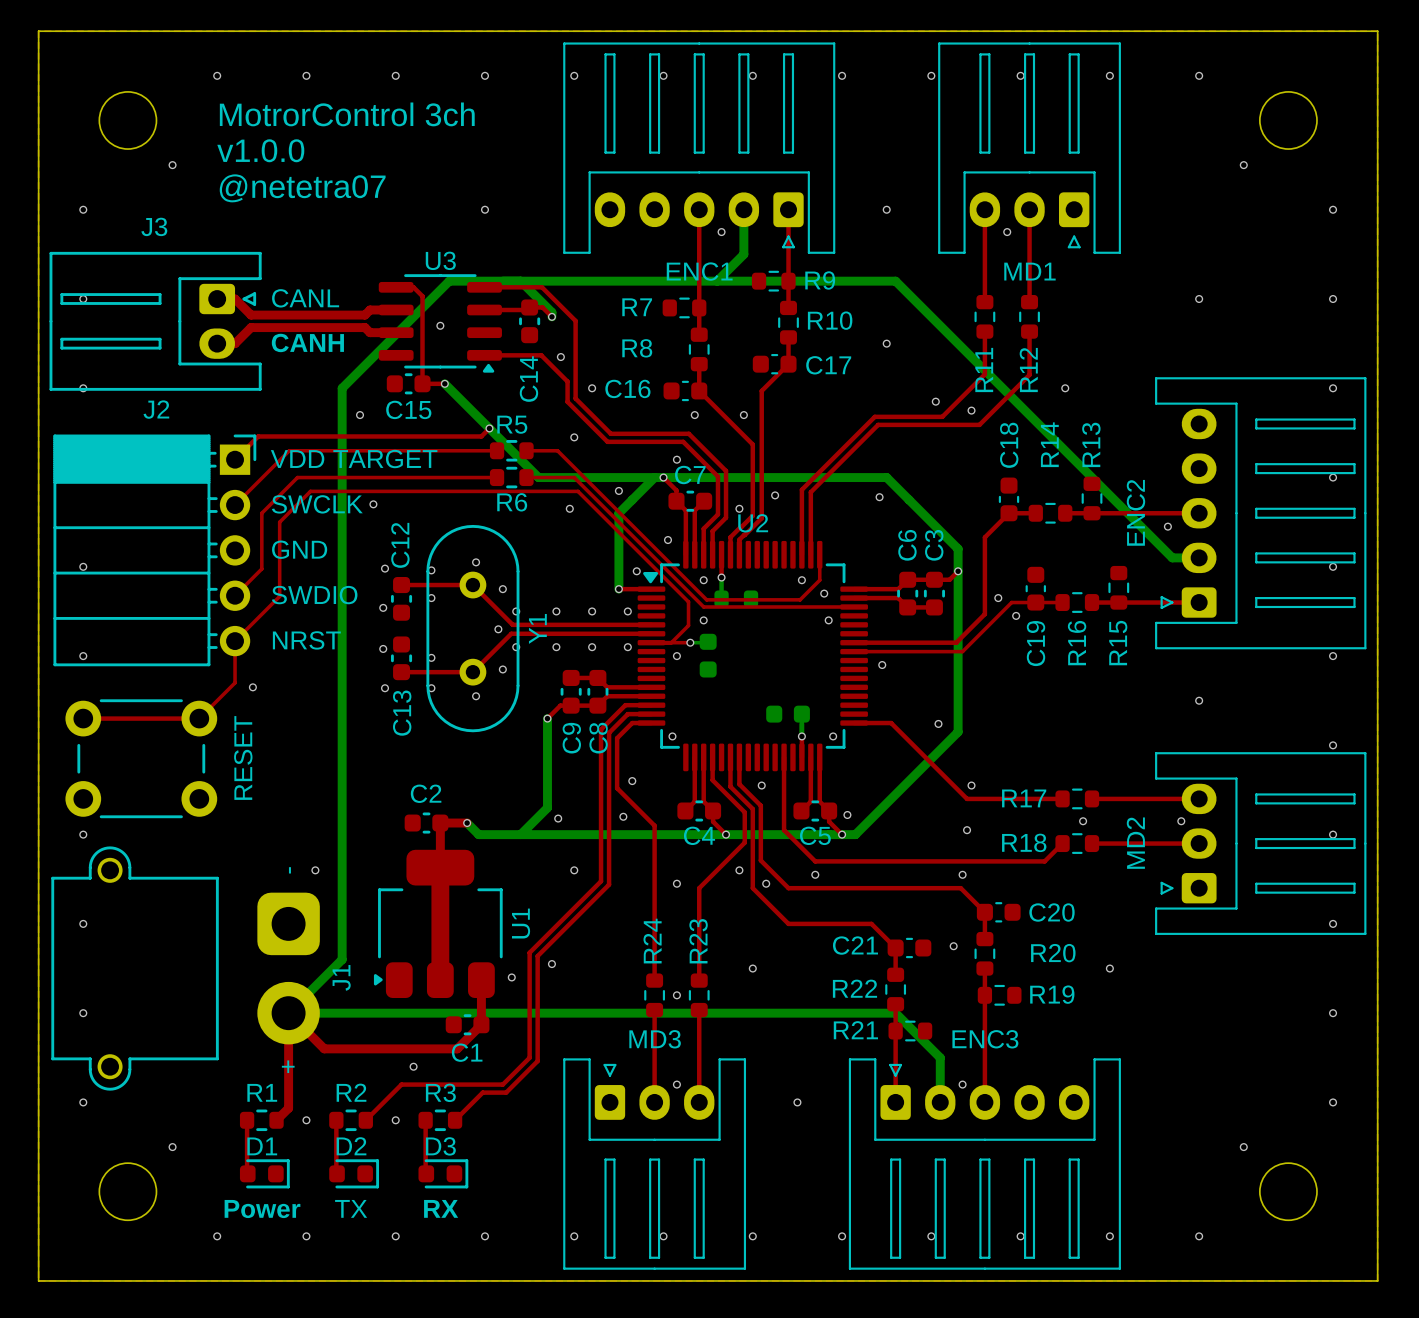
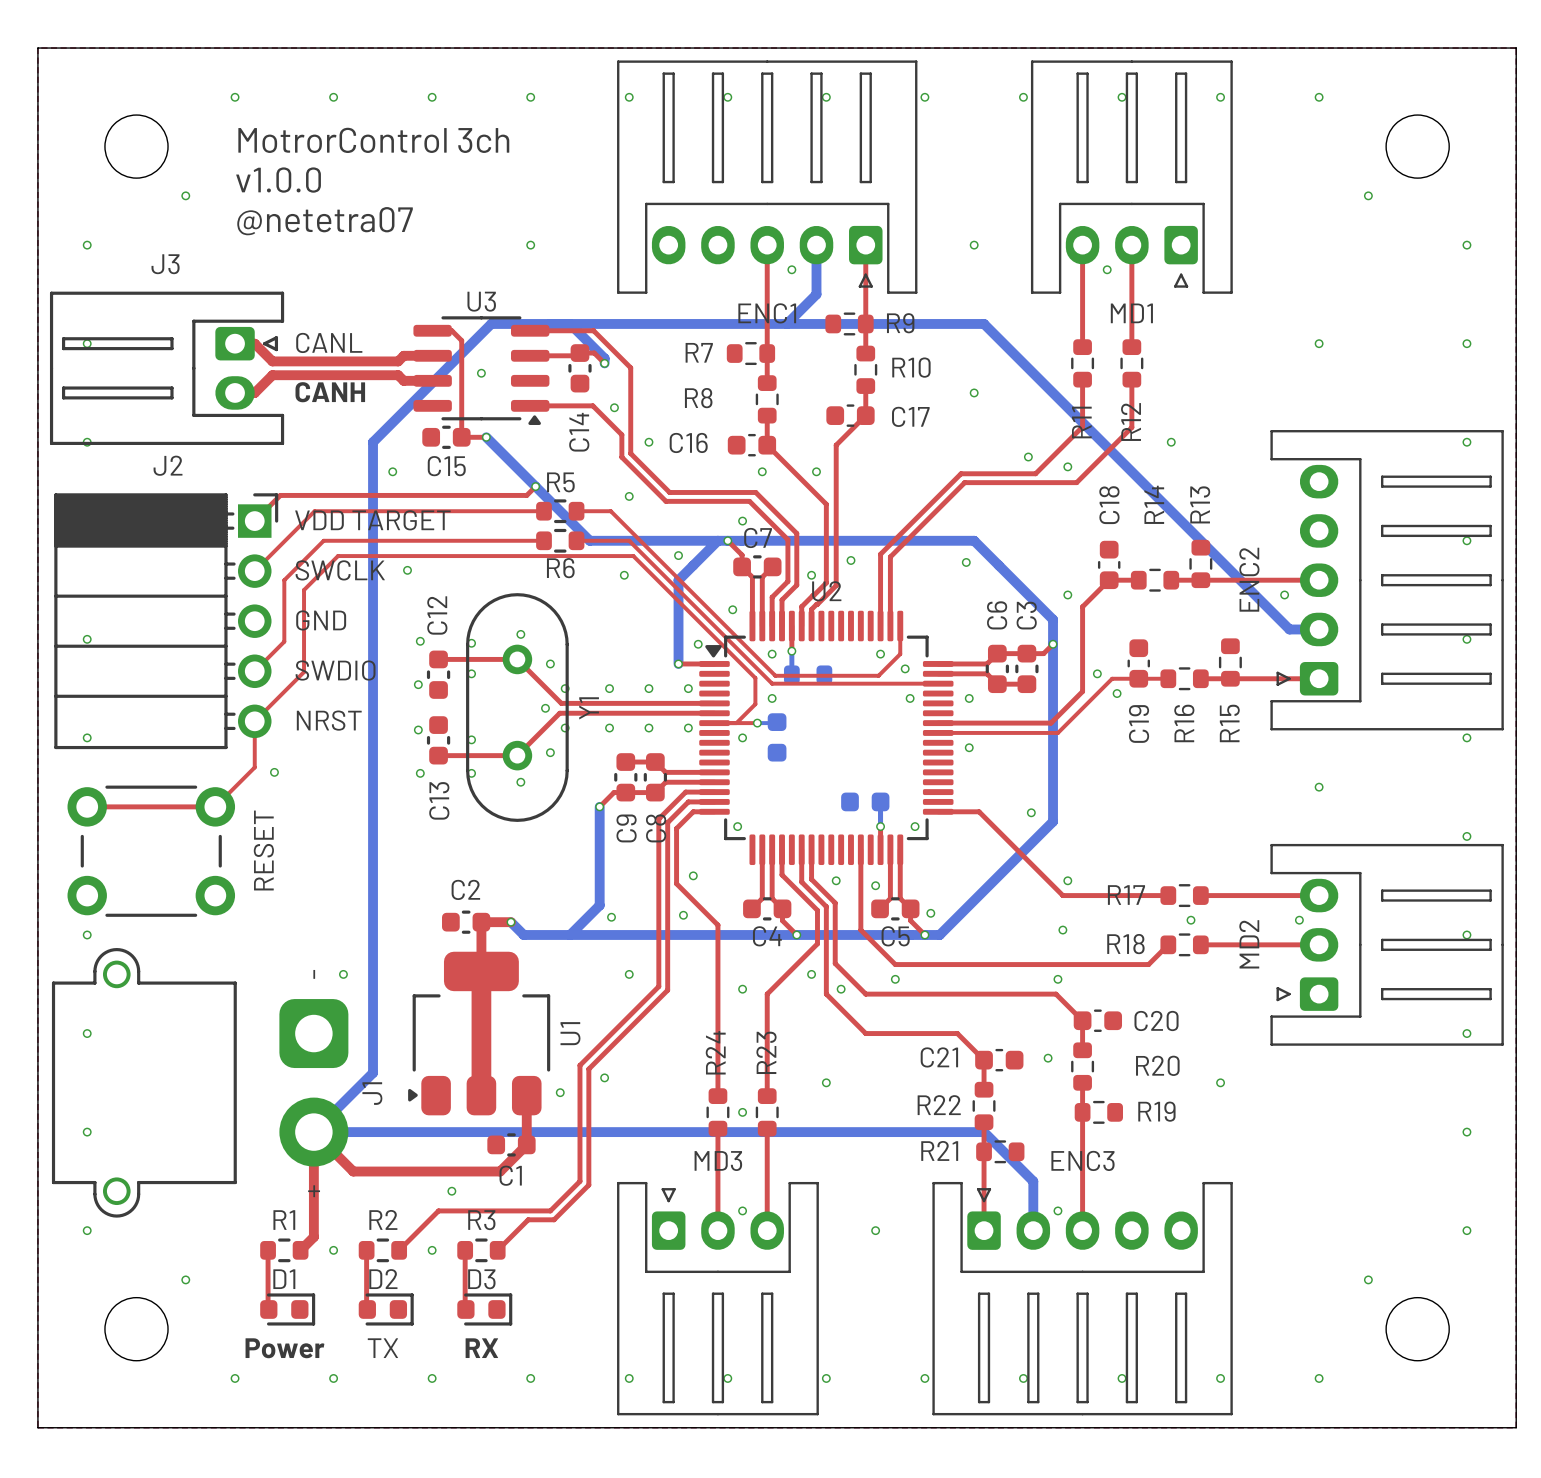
via: none -> (1067, 594)
via: none -> (969, 698)
via: none -> (875, 885)

